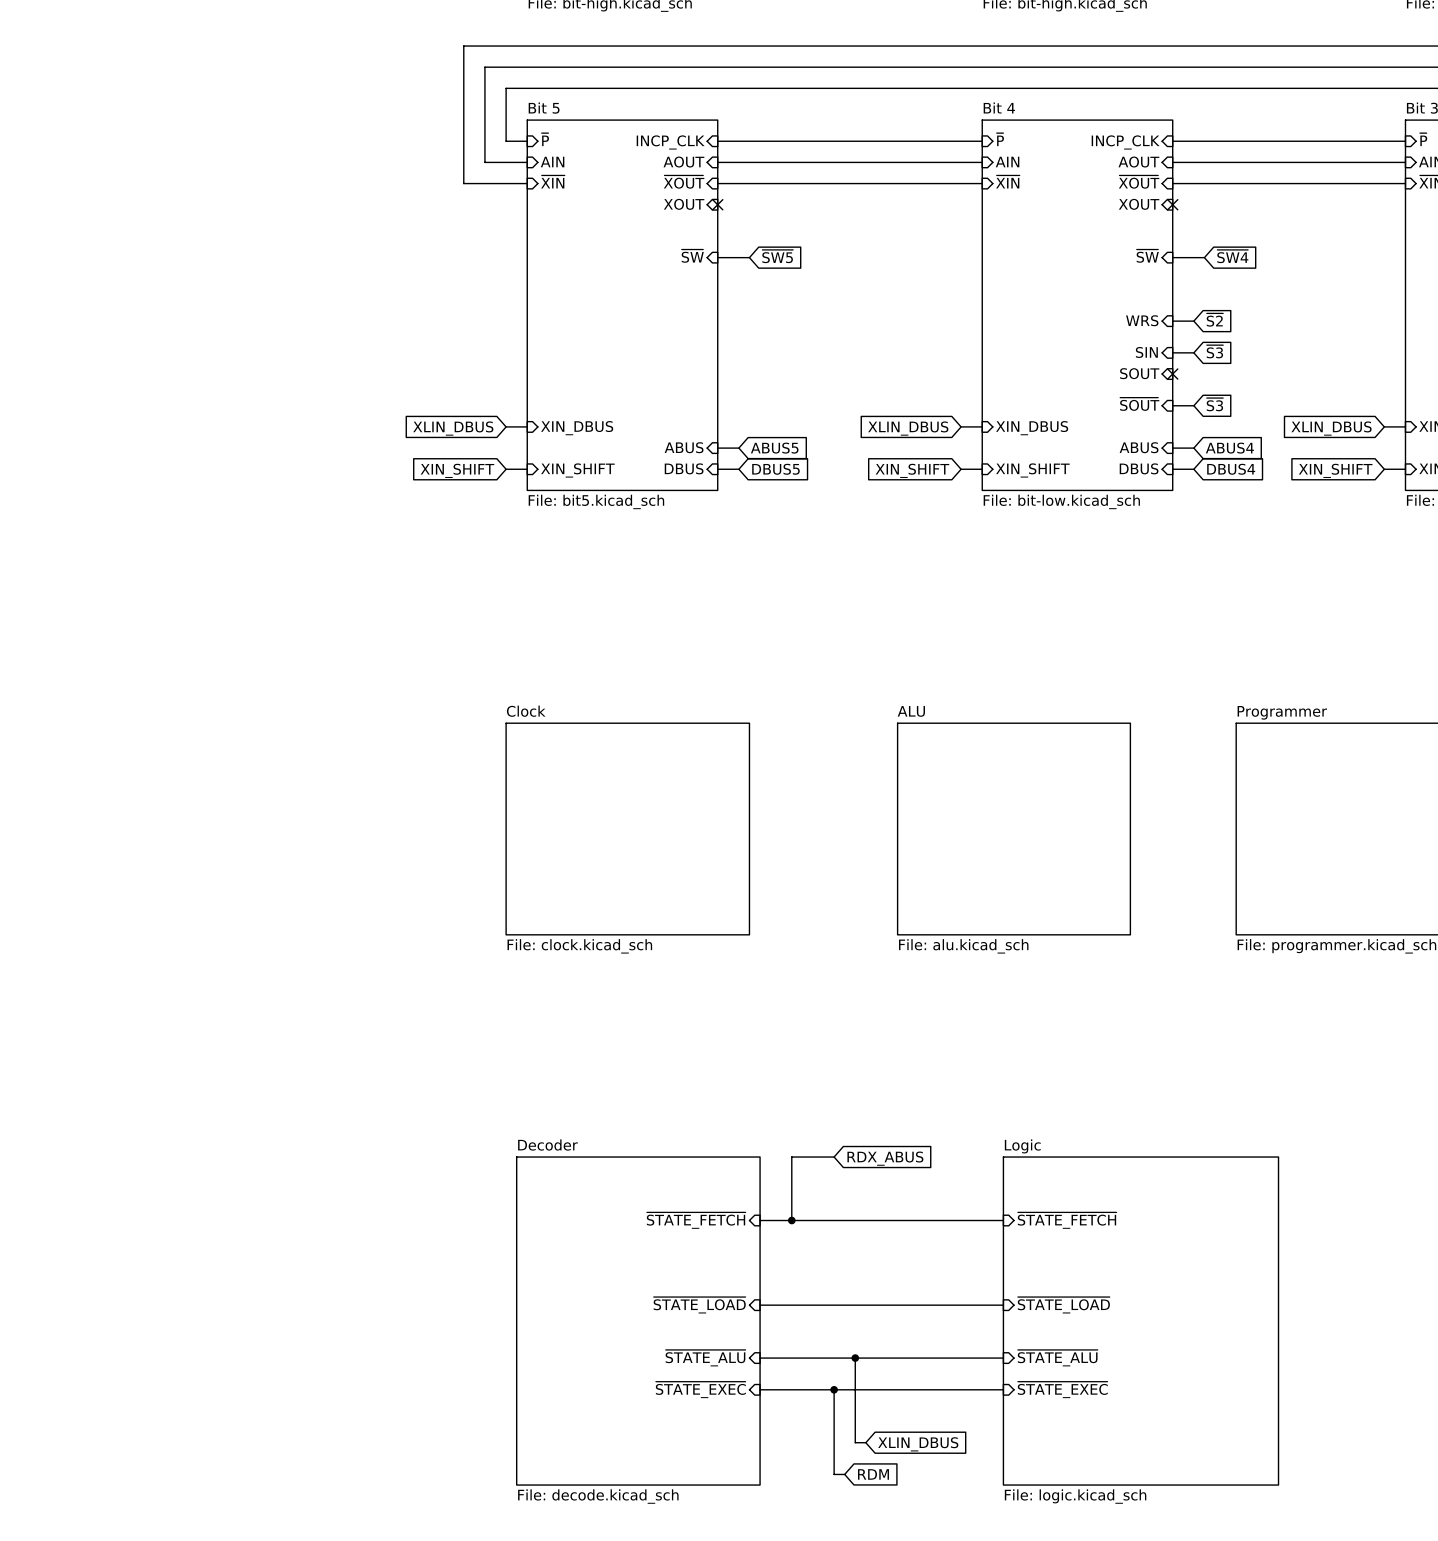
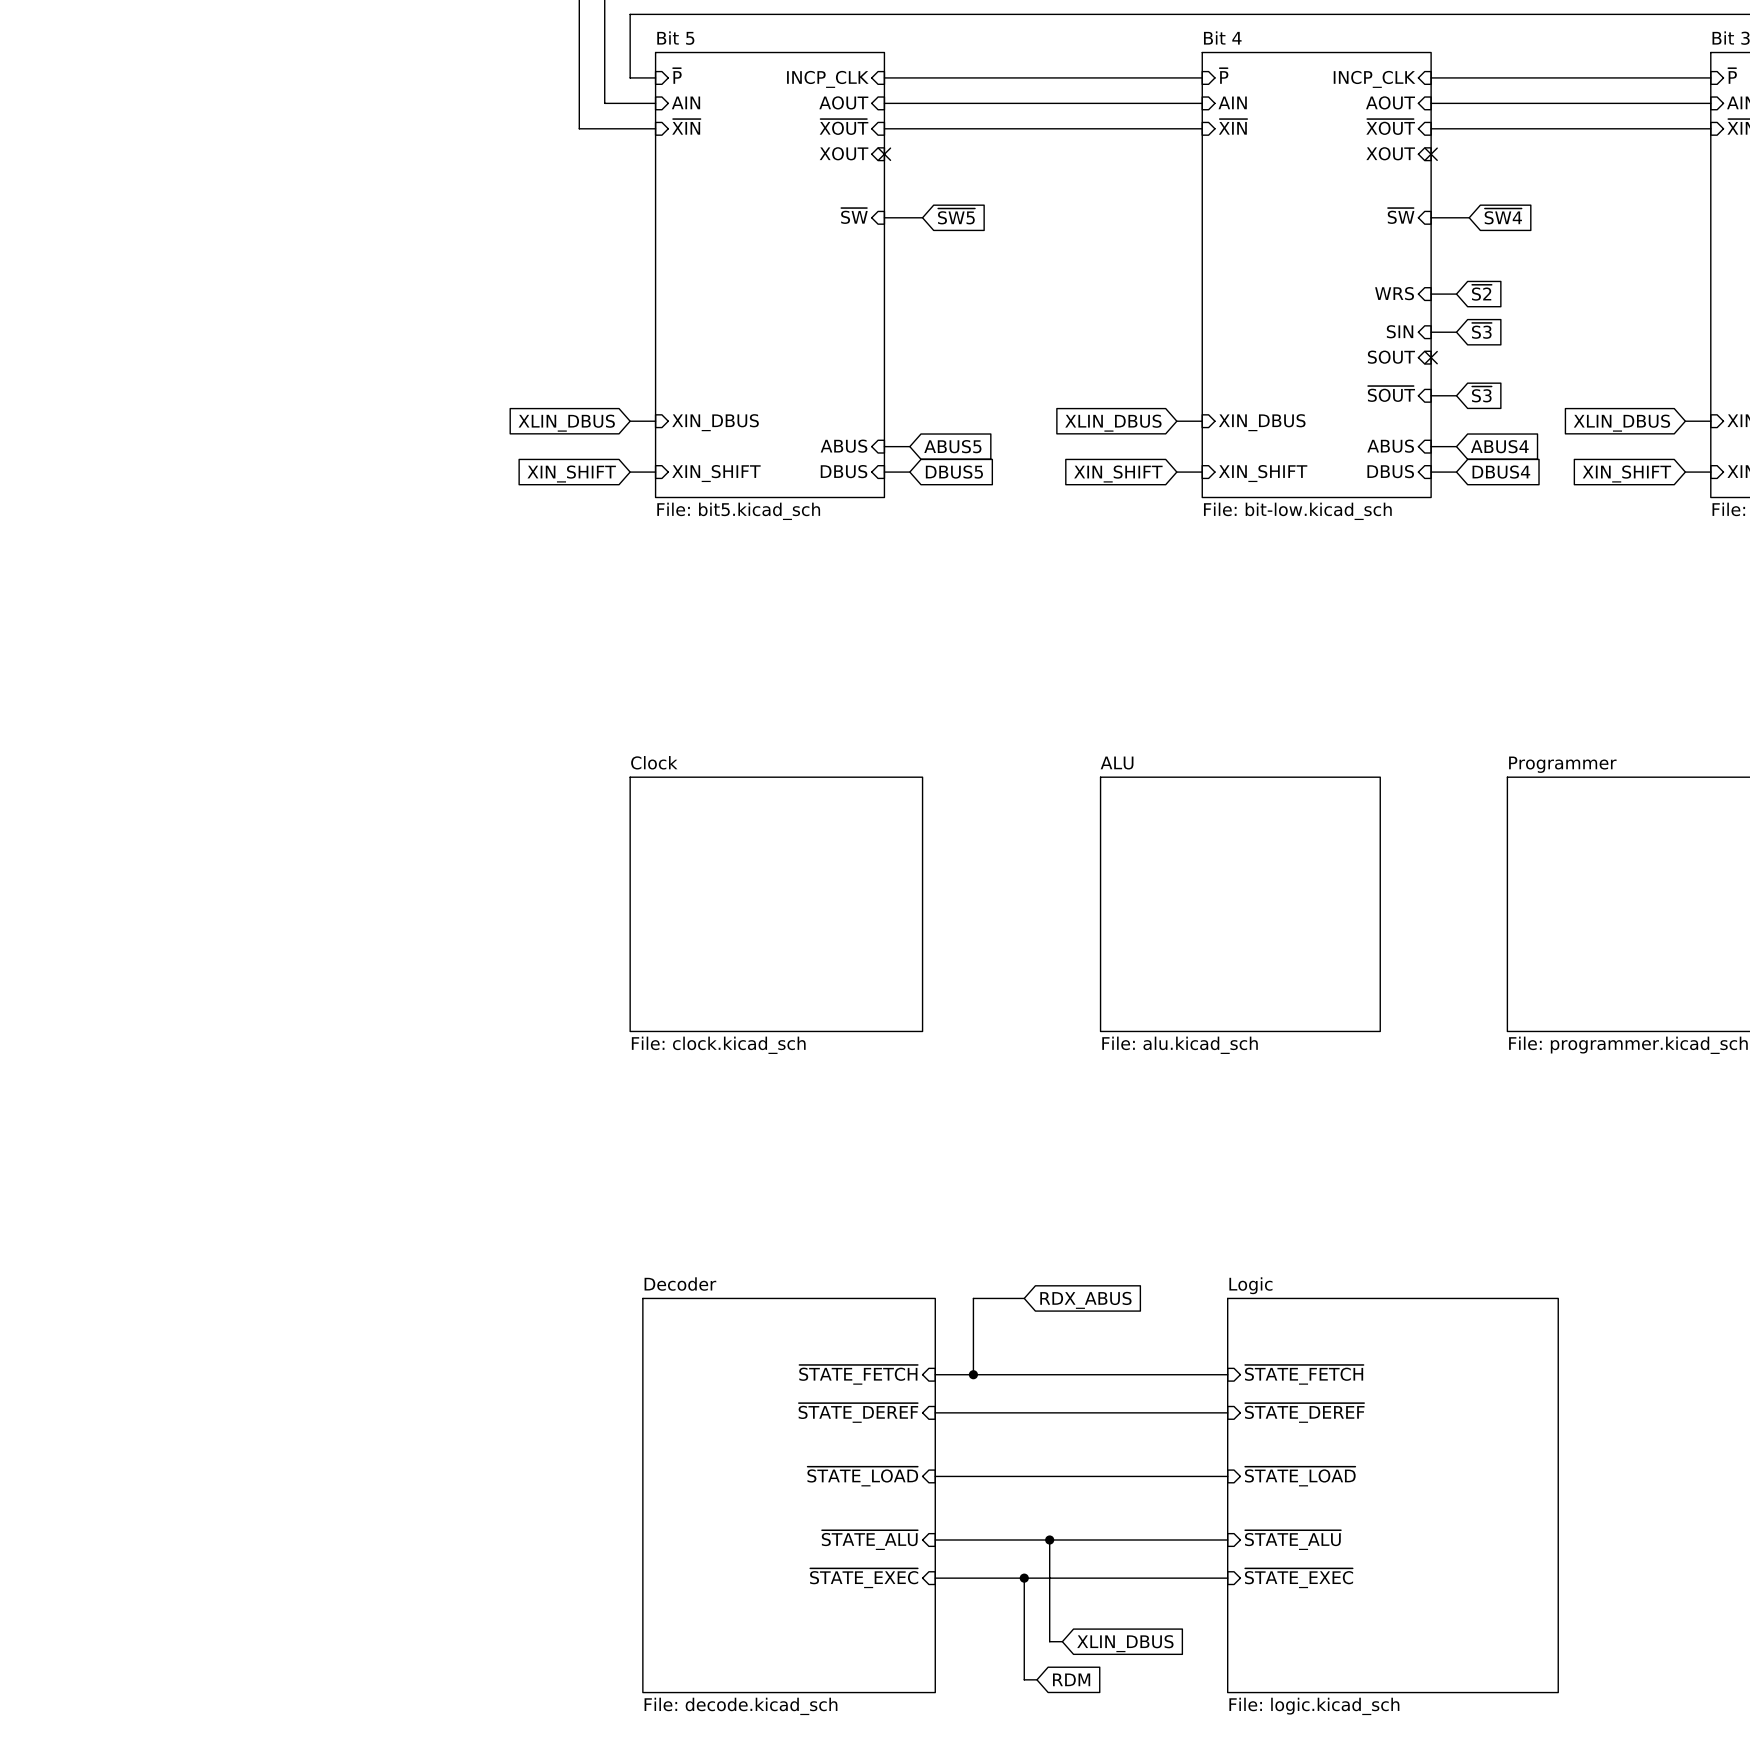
sheet pin: none -> ~{STATE_DEREF} (858, 1412)
wire: none -> (935, 1412) (1227, 1412)
sheet pin: none -> ~{STATE_DEREF} (1304, 1412)

